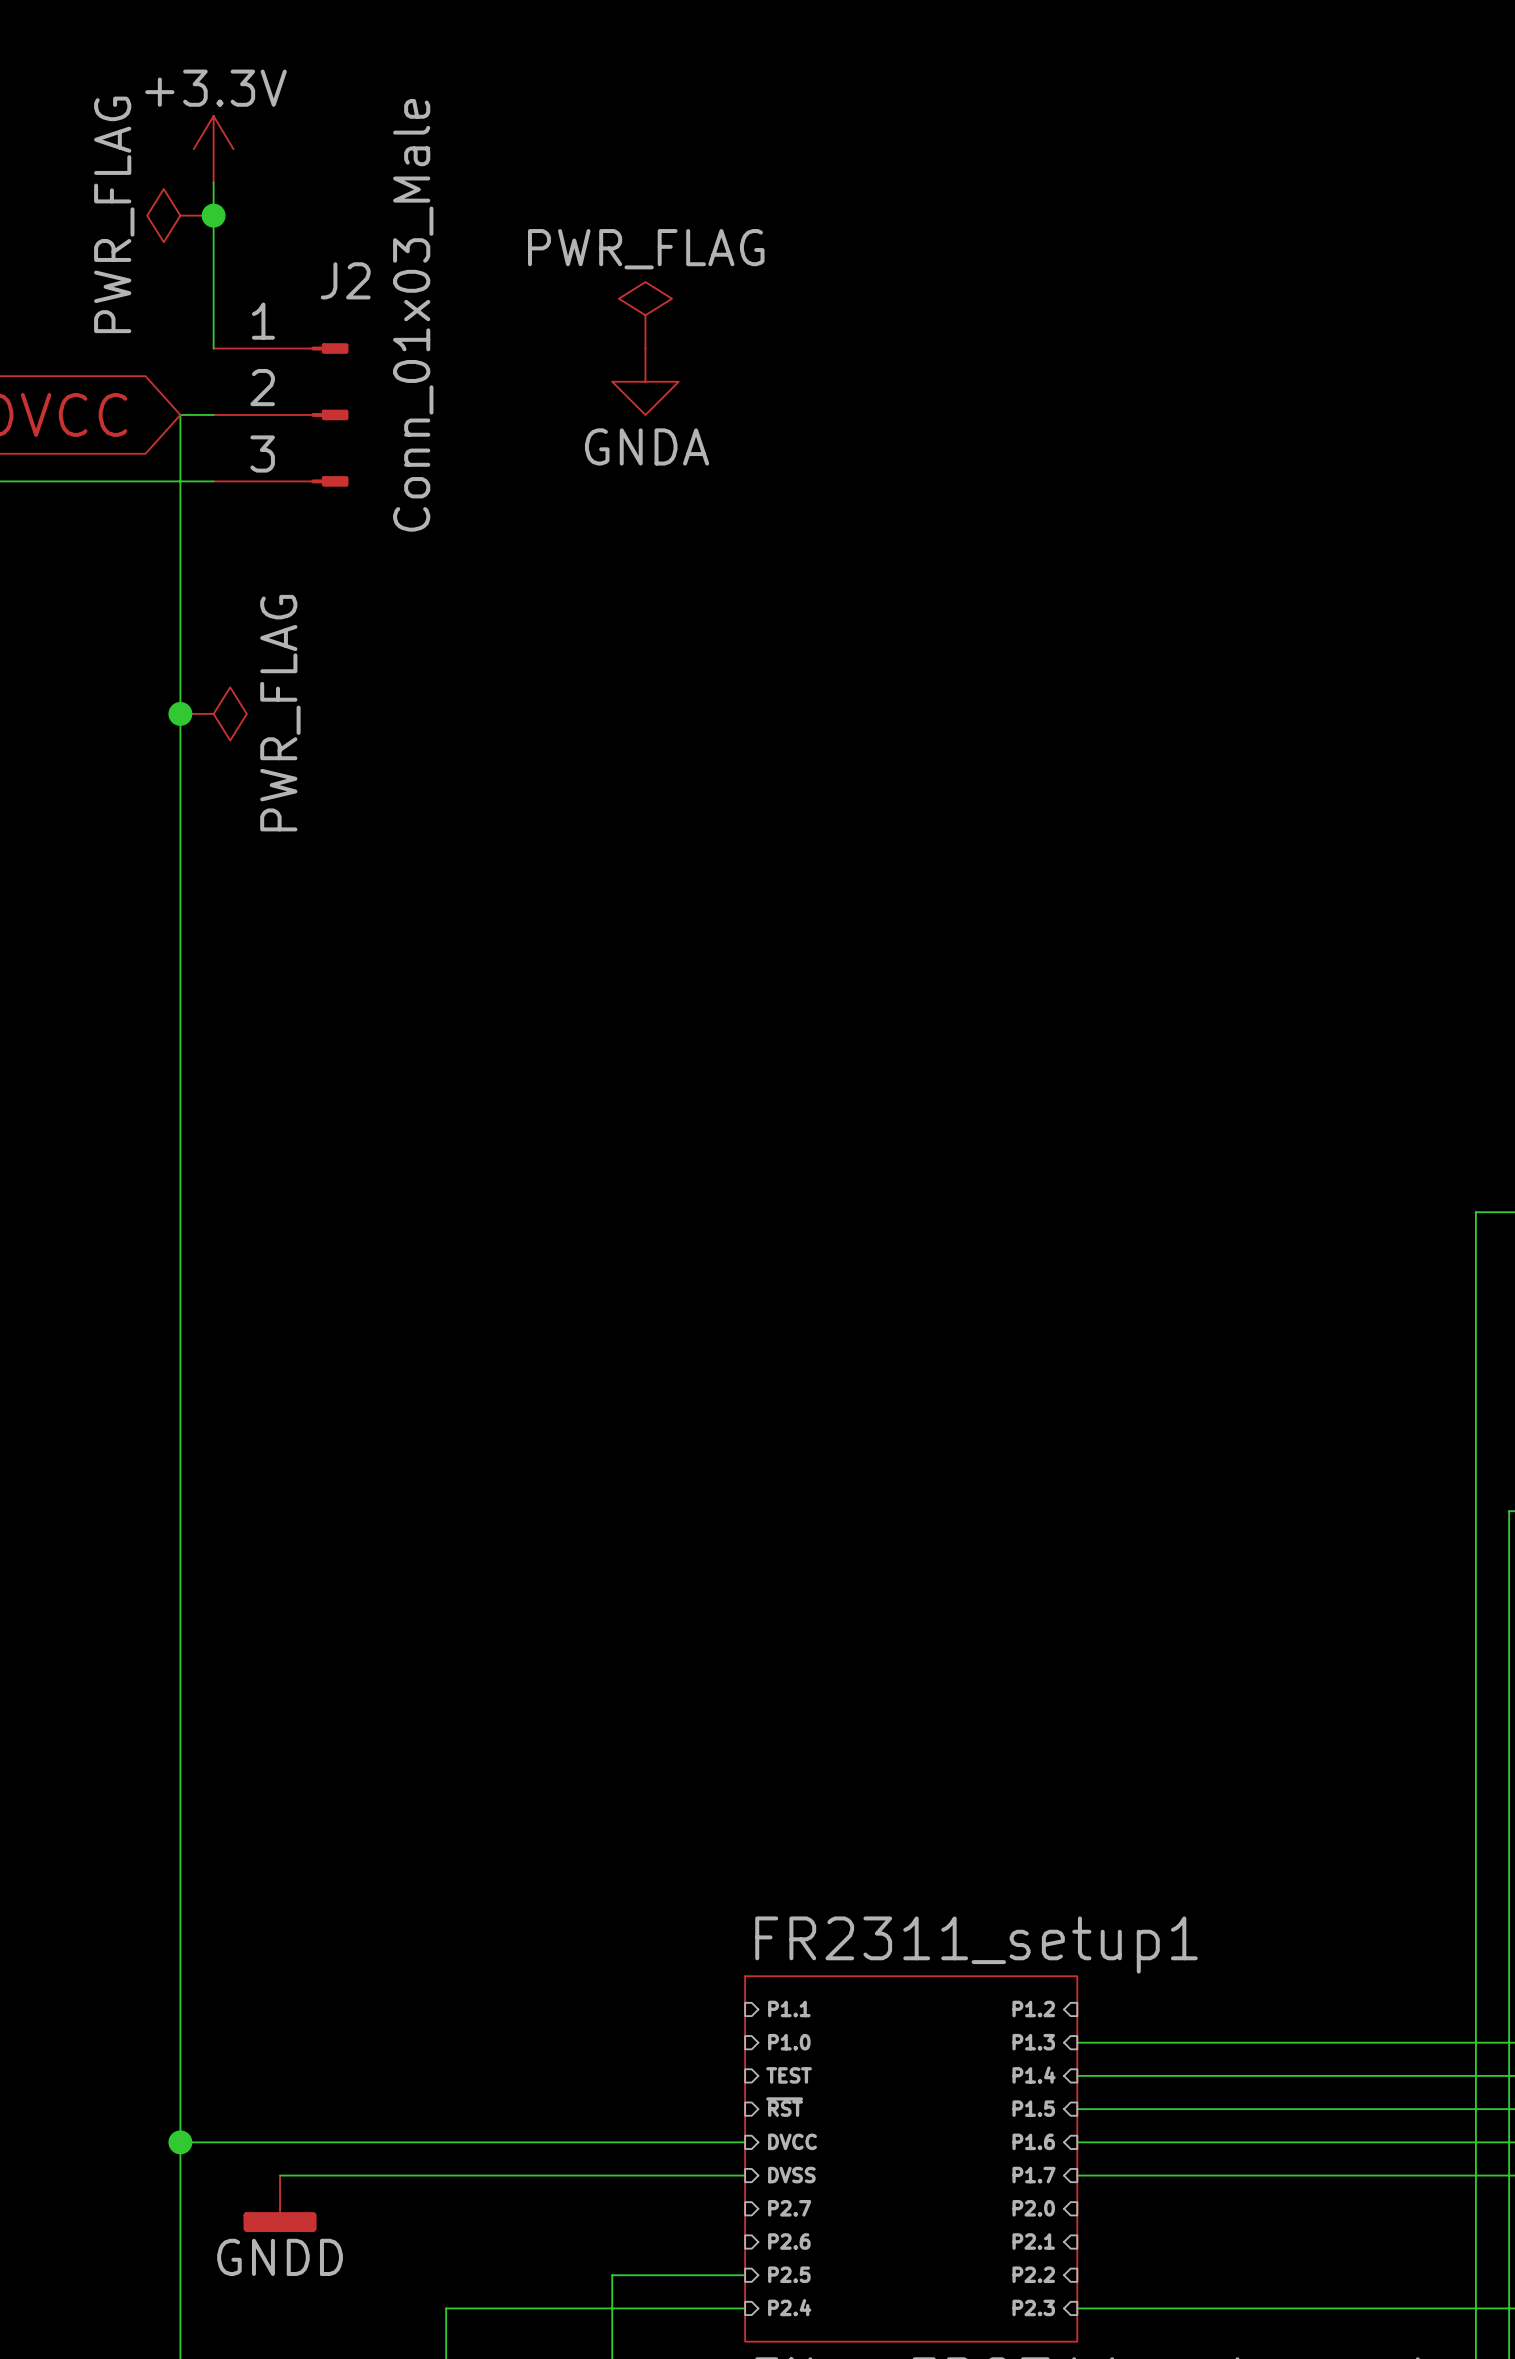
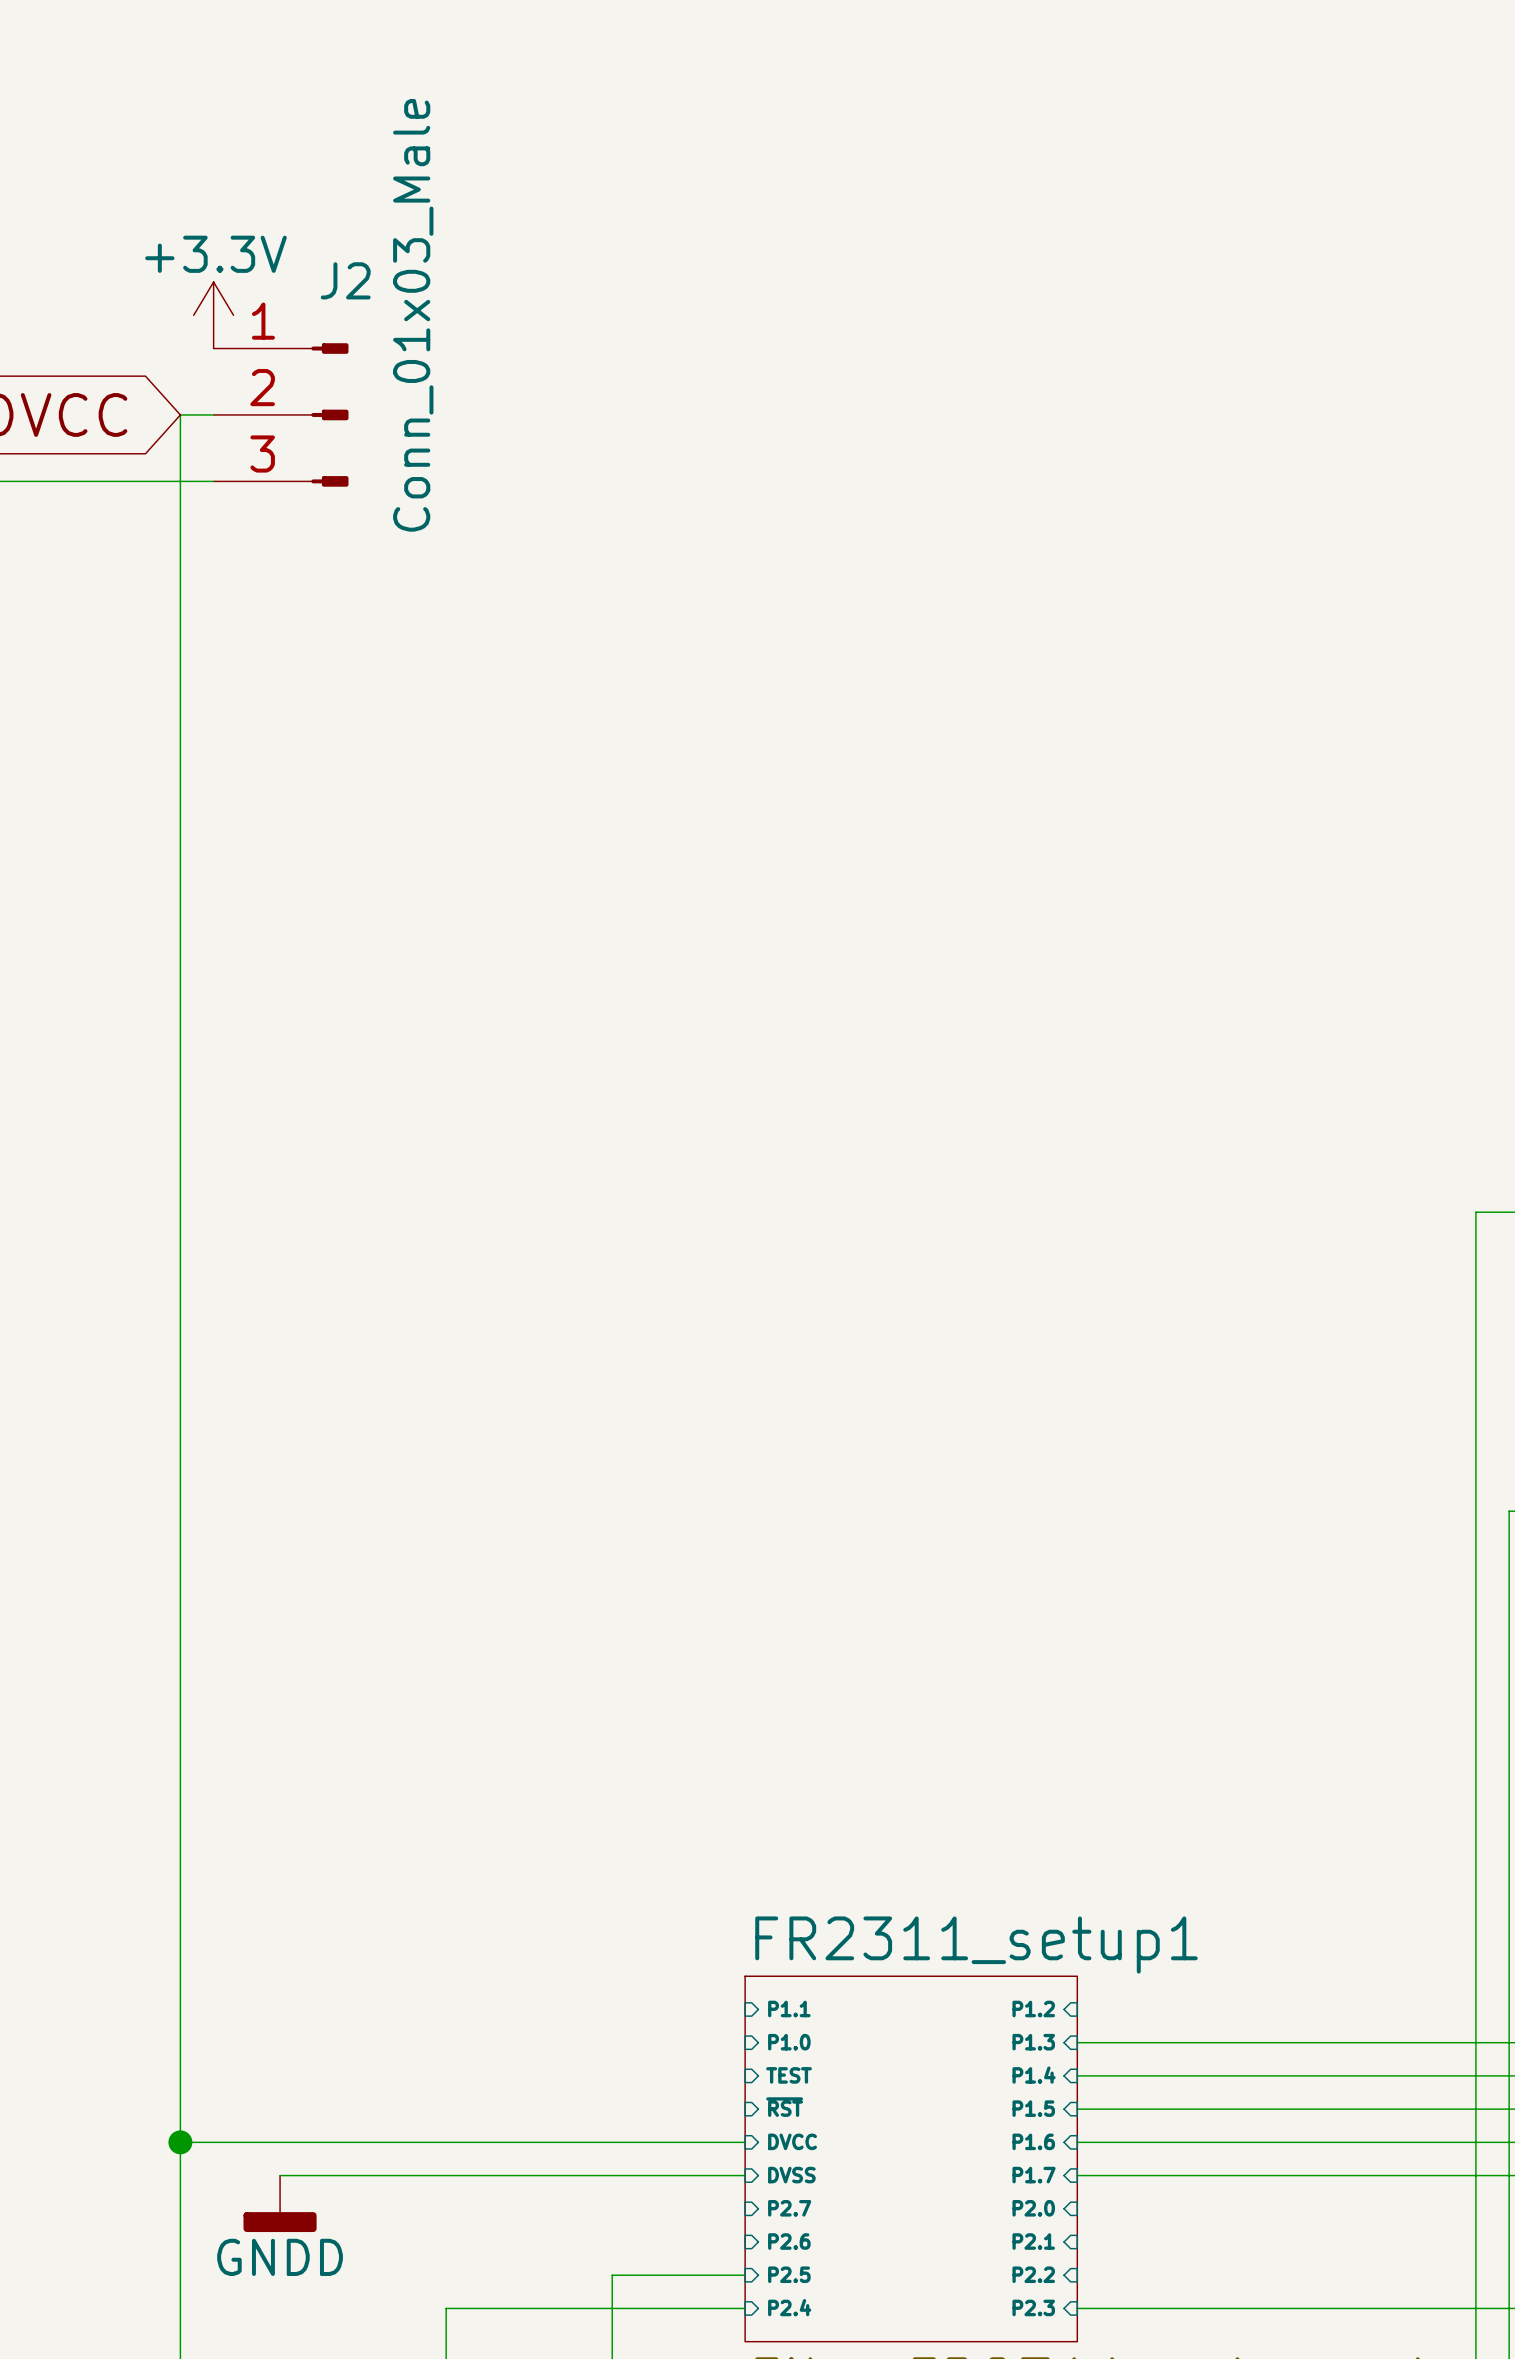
power symbol position: +3.3V (213, 149) -> +3.3V (213, 315)
wire: (213, 182) (213, 348) -> none
power symbol: PWR_FLAG (180, 215) -> none
junction: (213, 215) -> none
power symbol: PWR_FLAG (645, 315) -> none
power symbol: GNDA (645, 381) -> none
junction: (180, 713) -> none
power symbol: PWR_FLAG (213, 713) -> none

